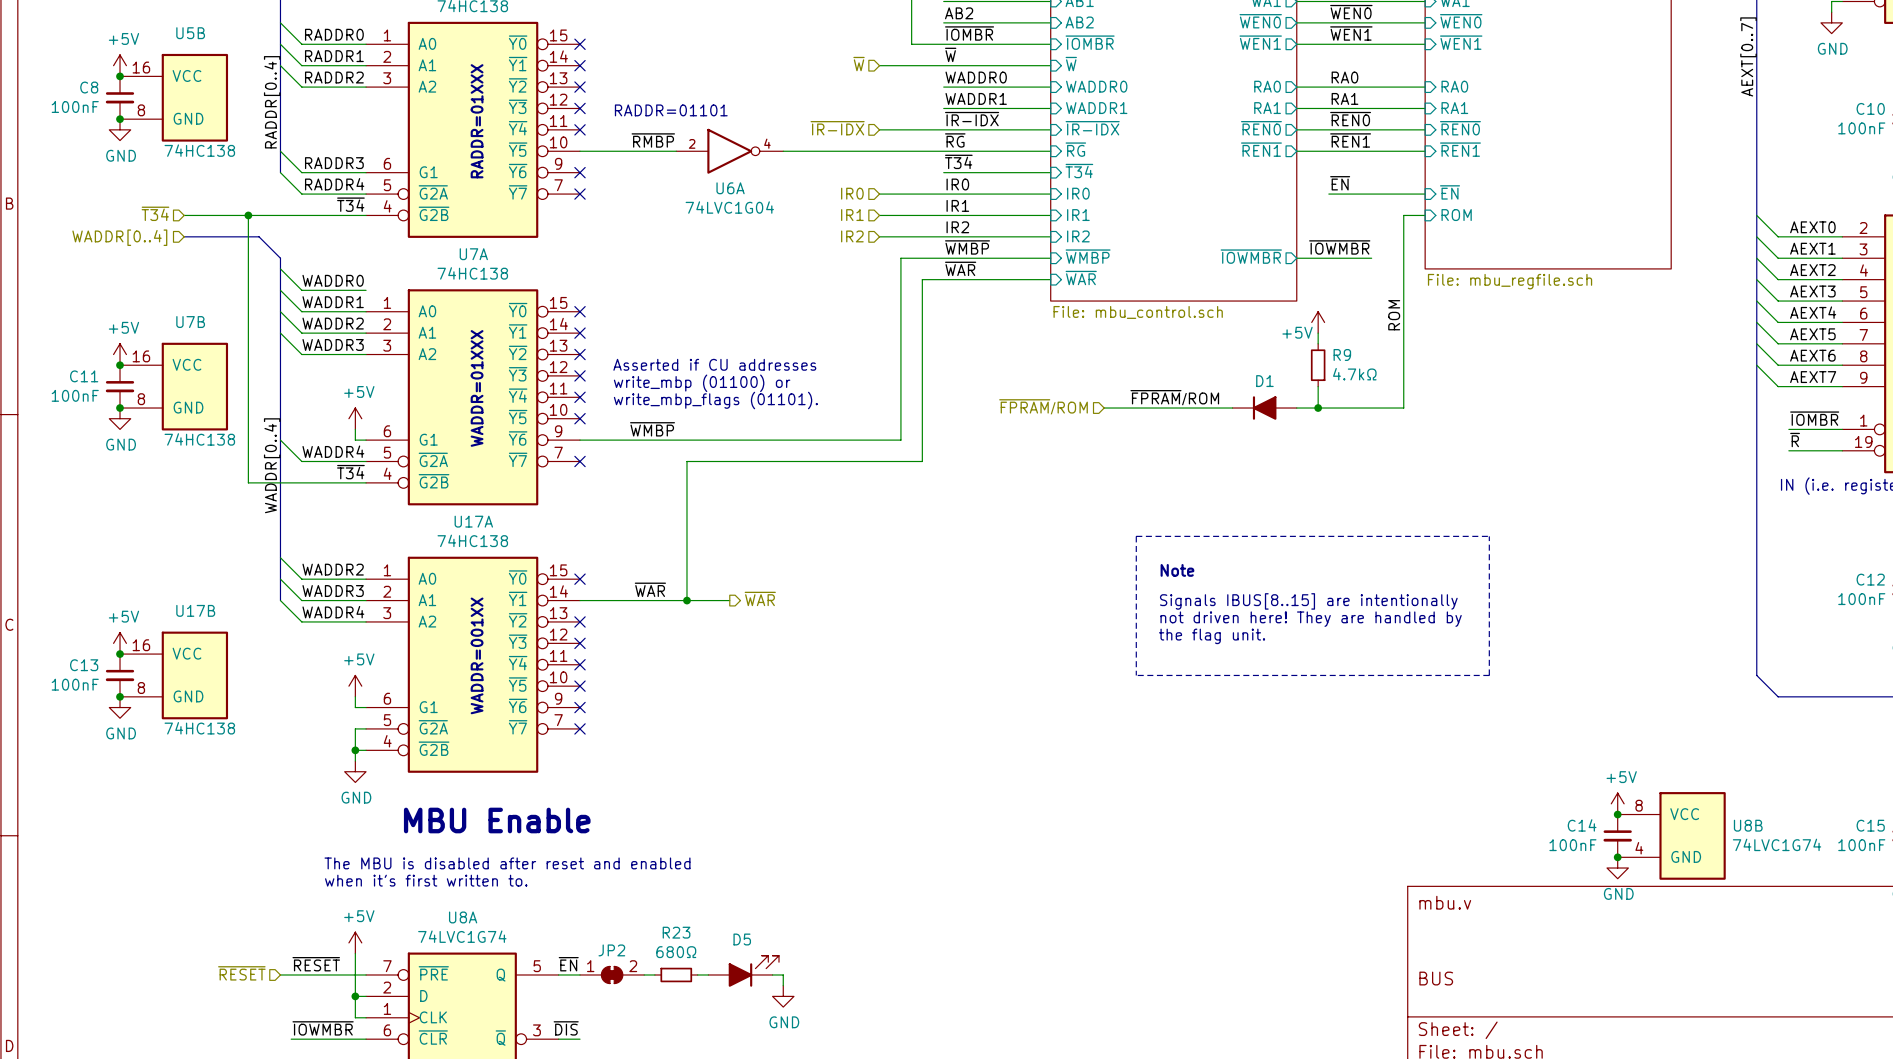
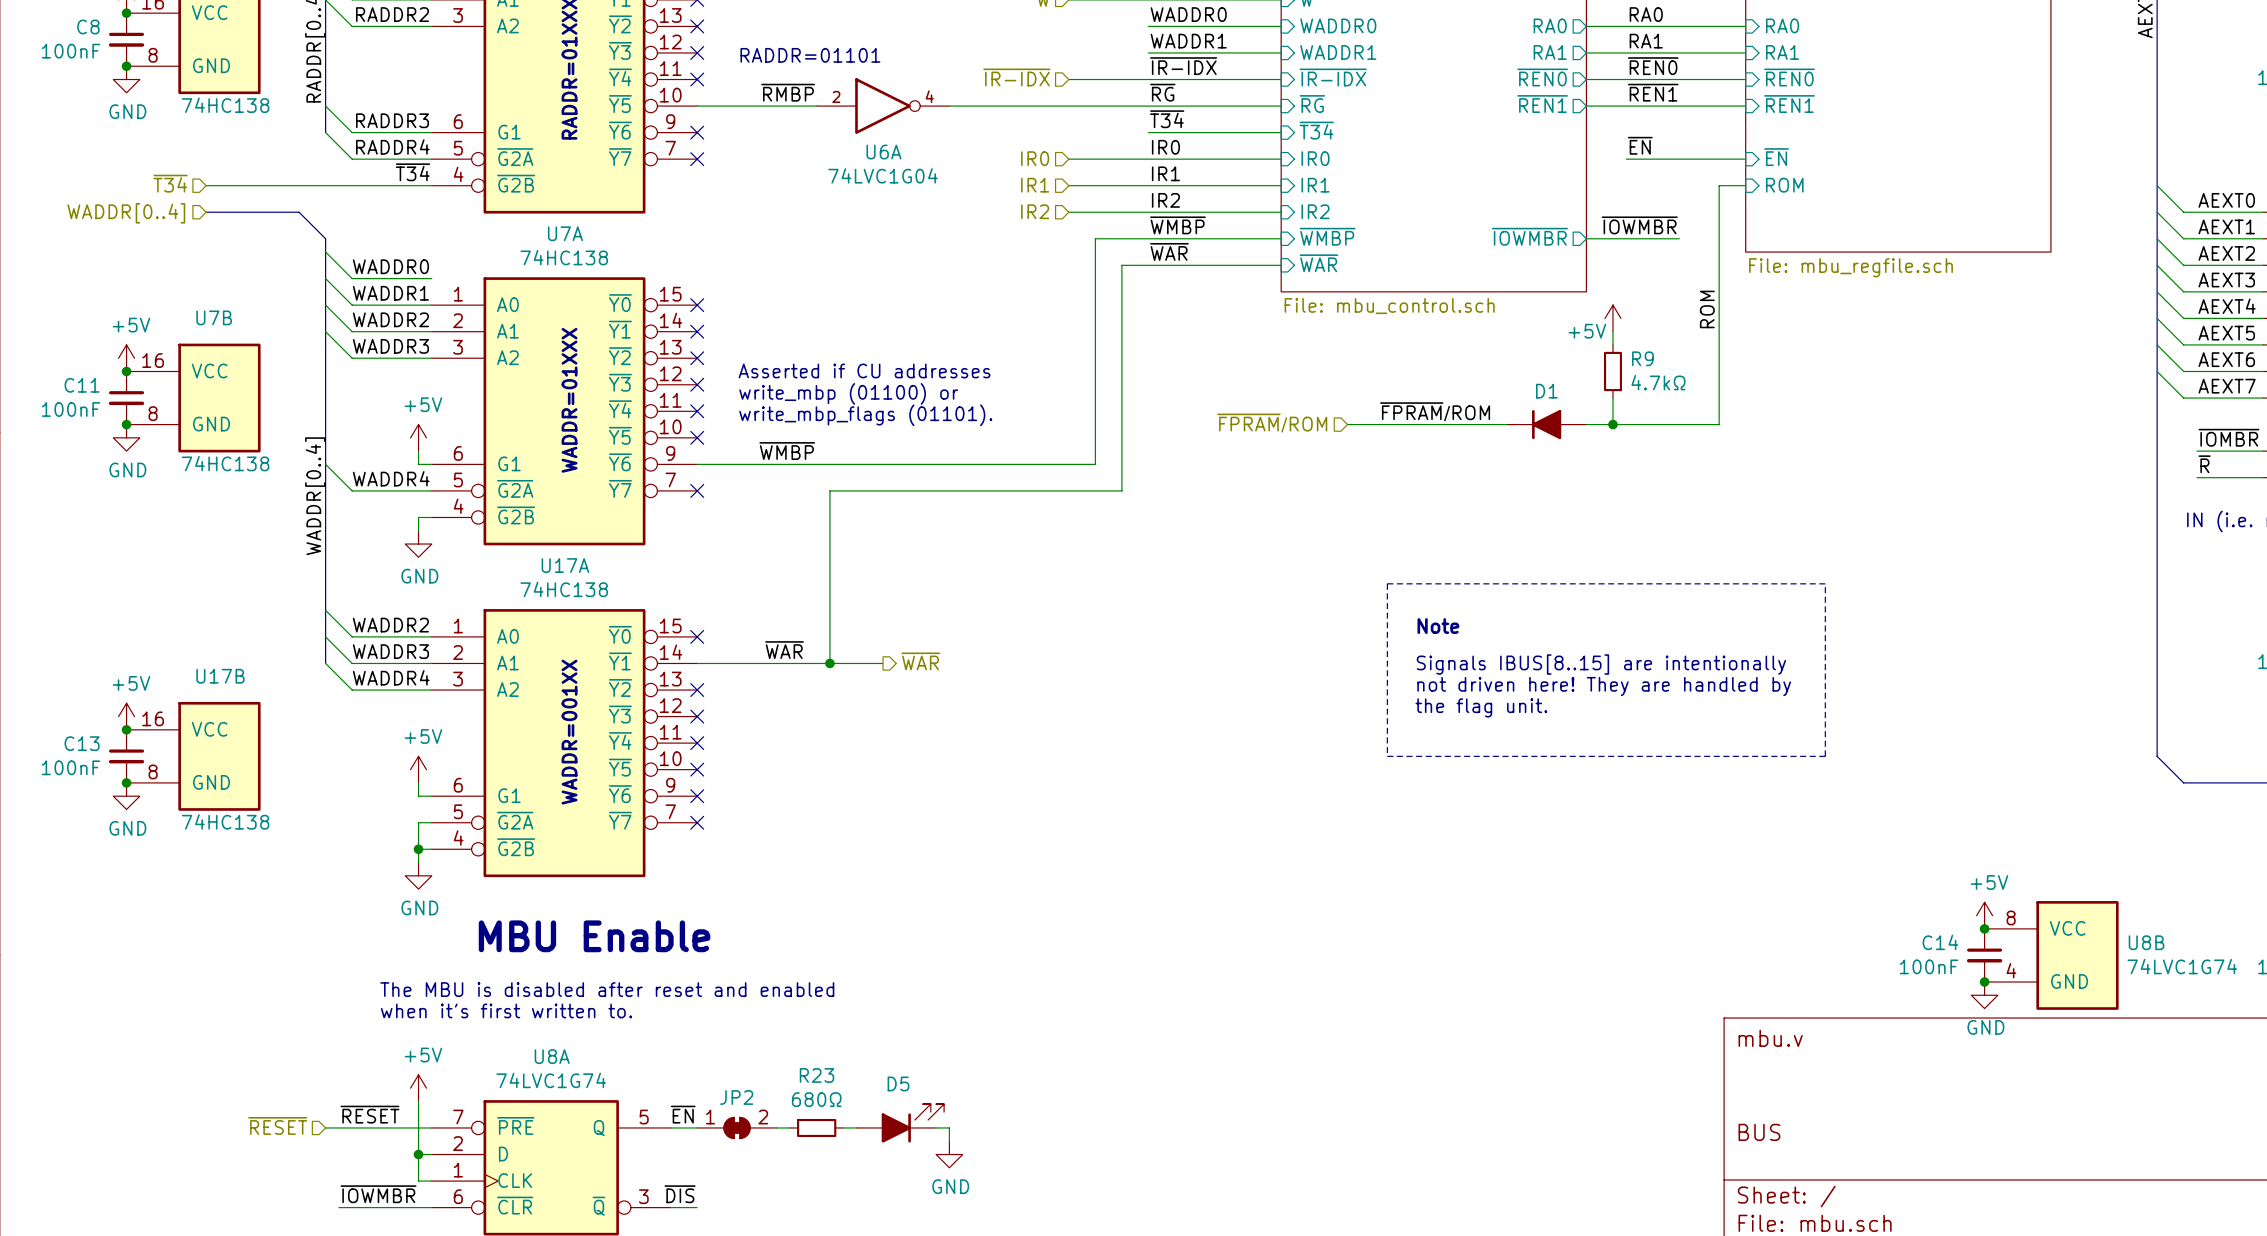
wire: (248, 215) (248, 482) (355, 482) -> (418, 530) (418, 517)
junction: (248, 215) -> none
label: ~{T34} (350, 472) -> none
power symbol: none -> GND (418, 544)

